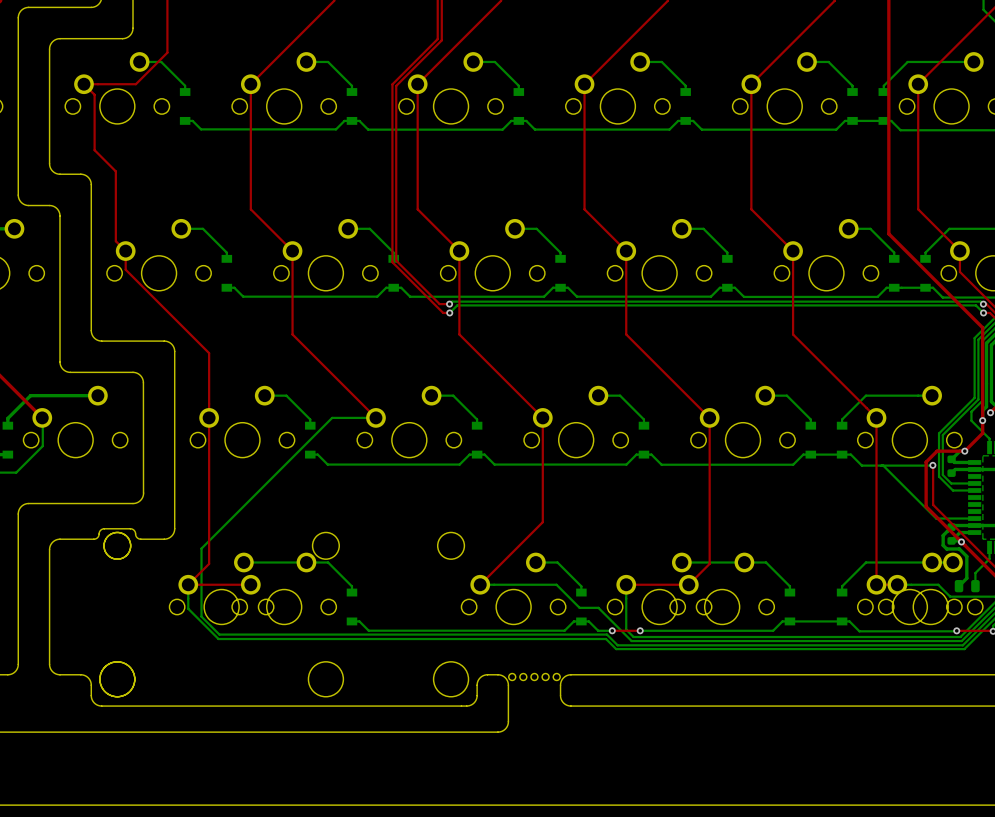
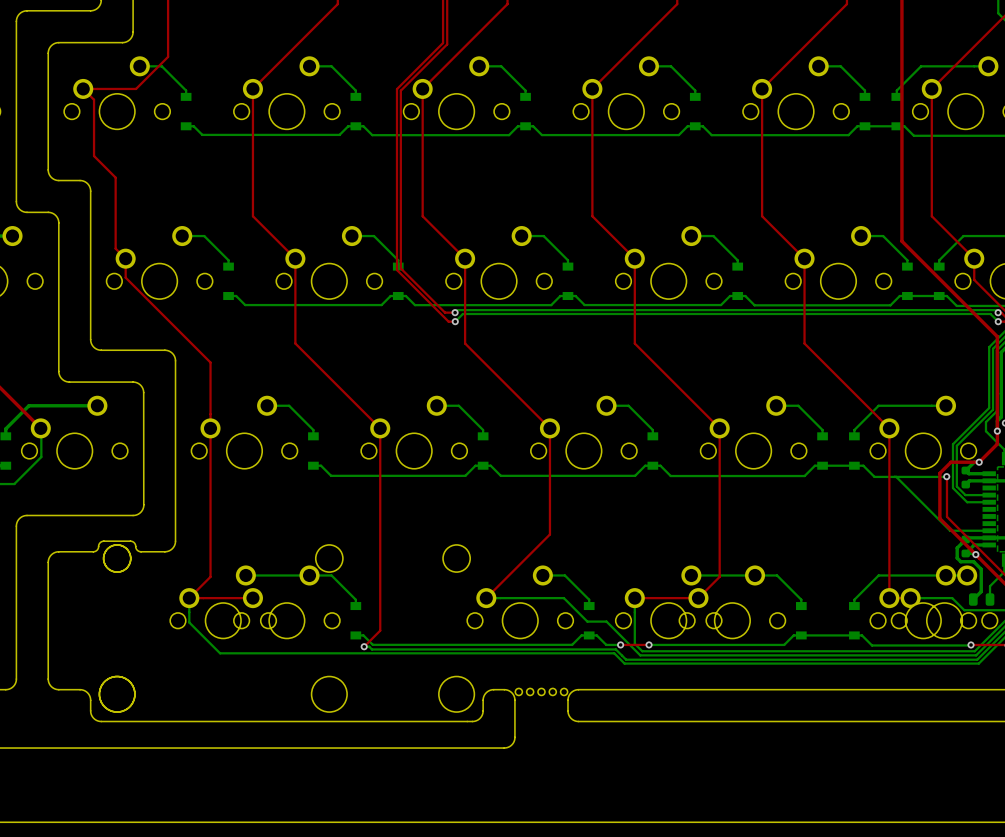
bottom track: (375, 417) (332, 417) (201, 548) (201, 616) (219, 634) (607, 635) -> (364, 646) (369, 646) (371, 649) (615, 649)
top track: none -> (380, 428) (380, 630) (364, 646)
via: none -> (364, 646)

